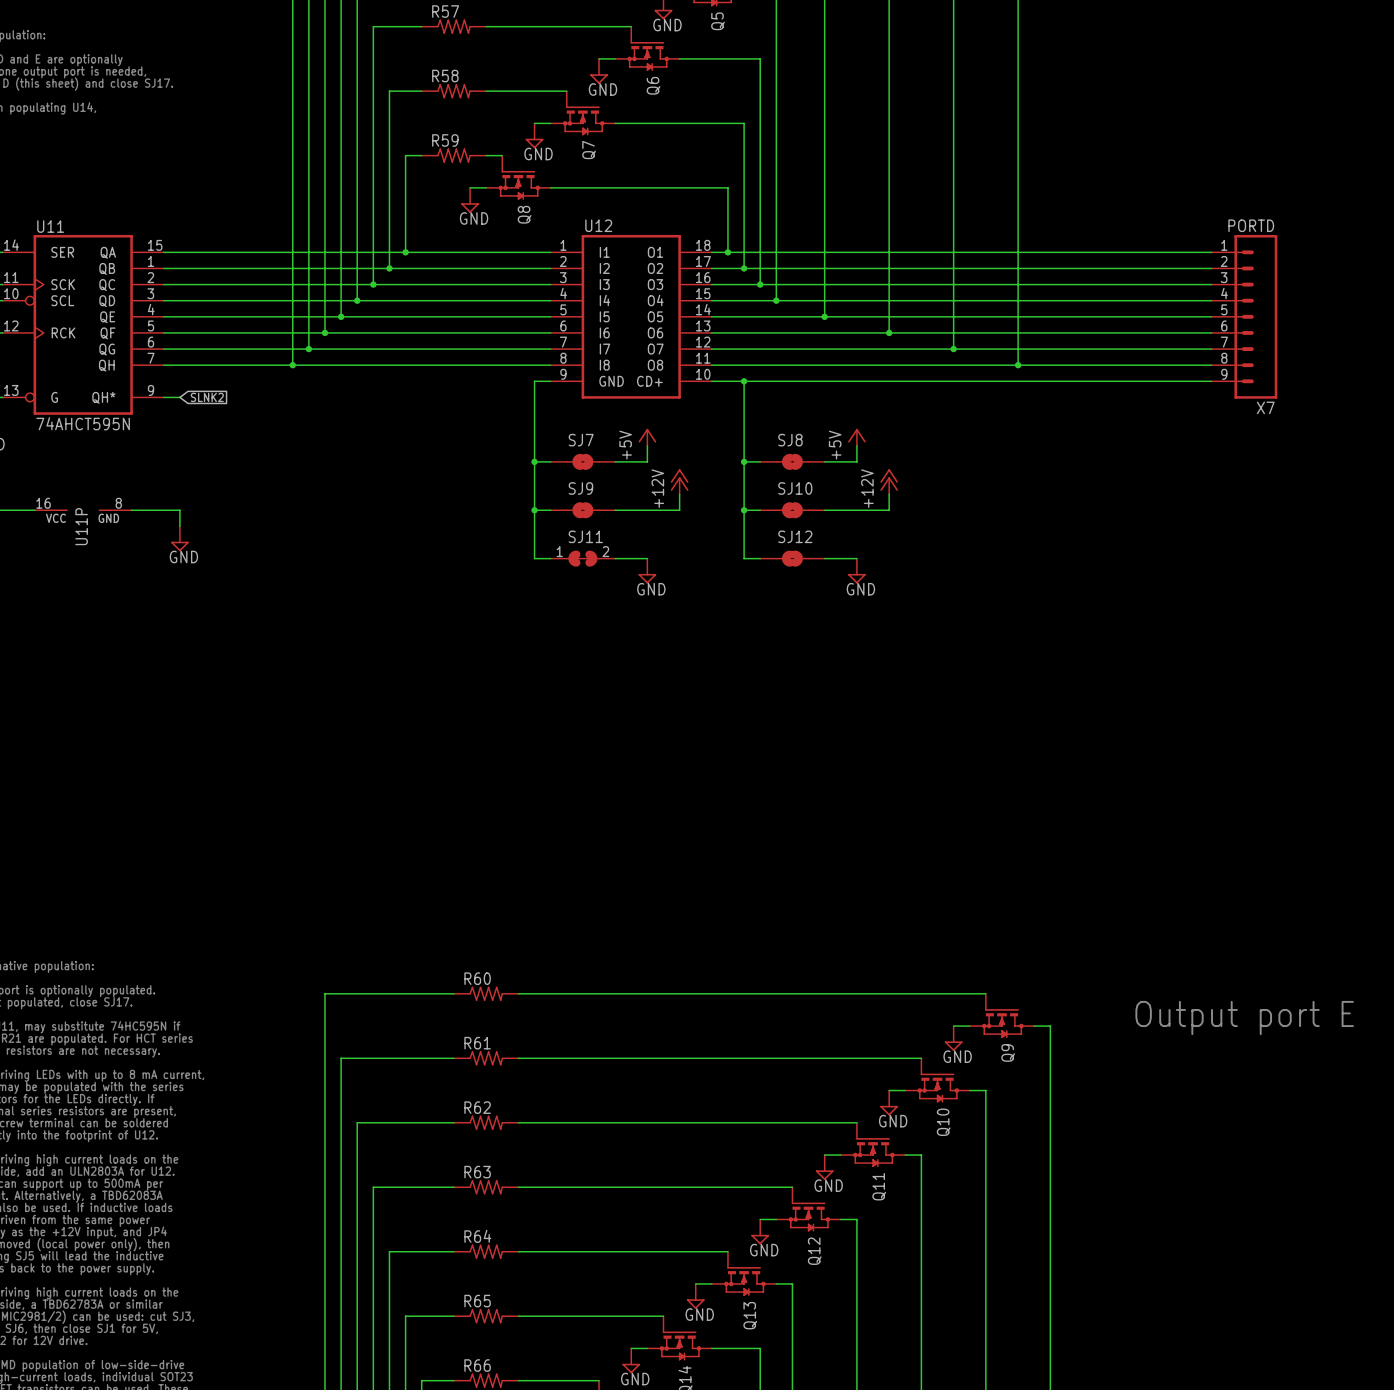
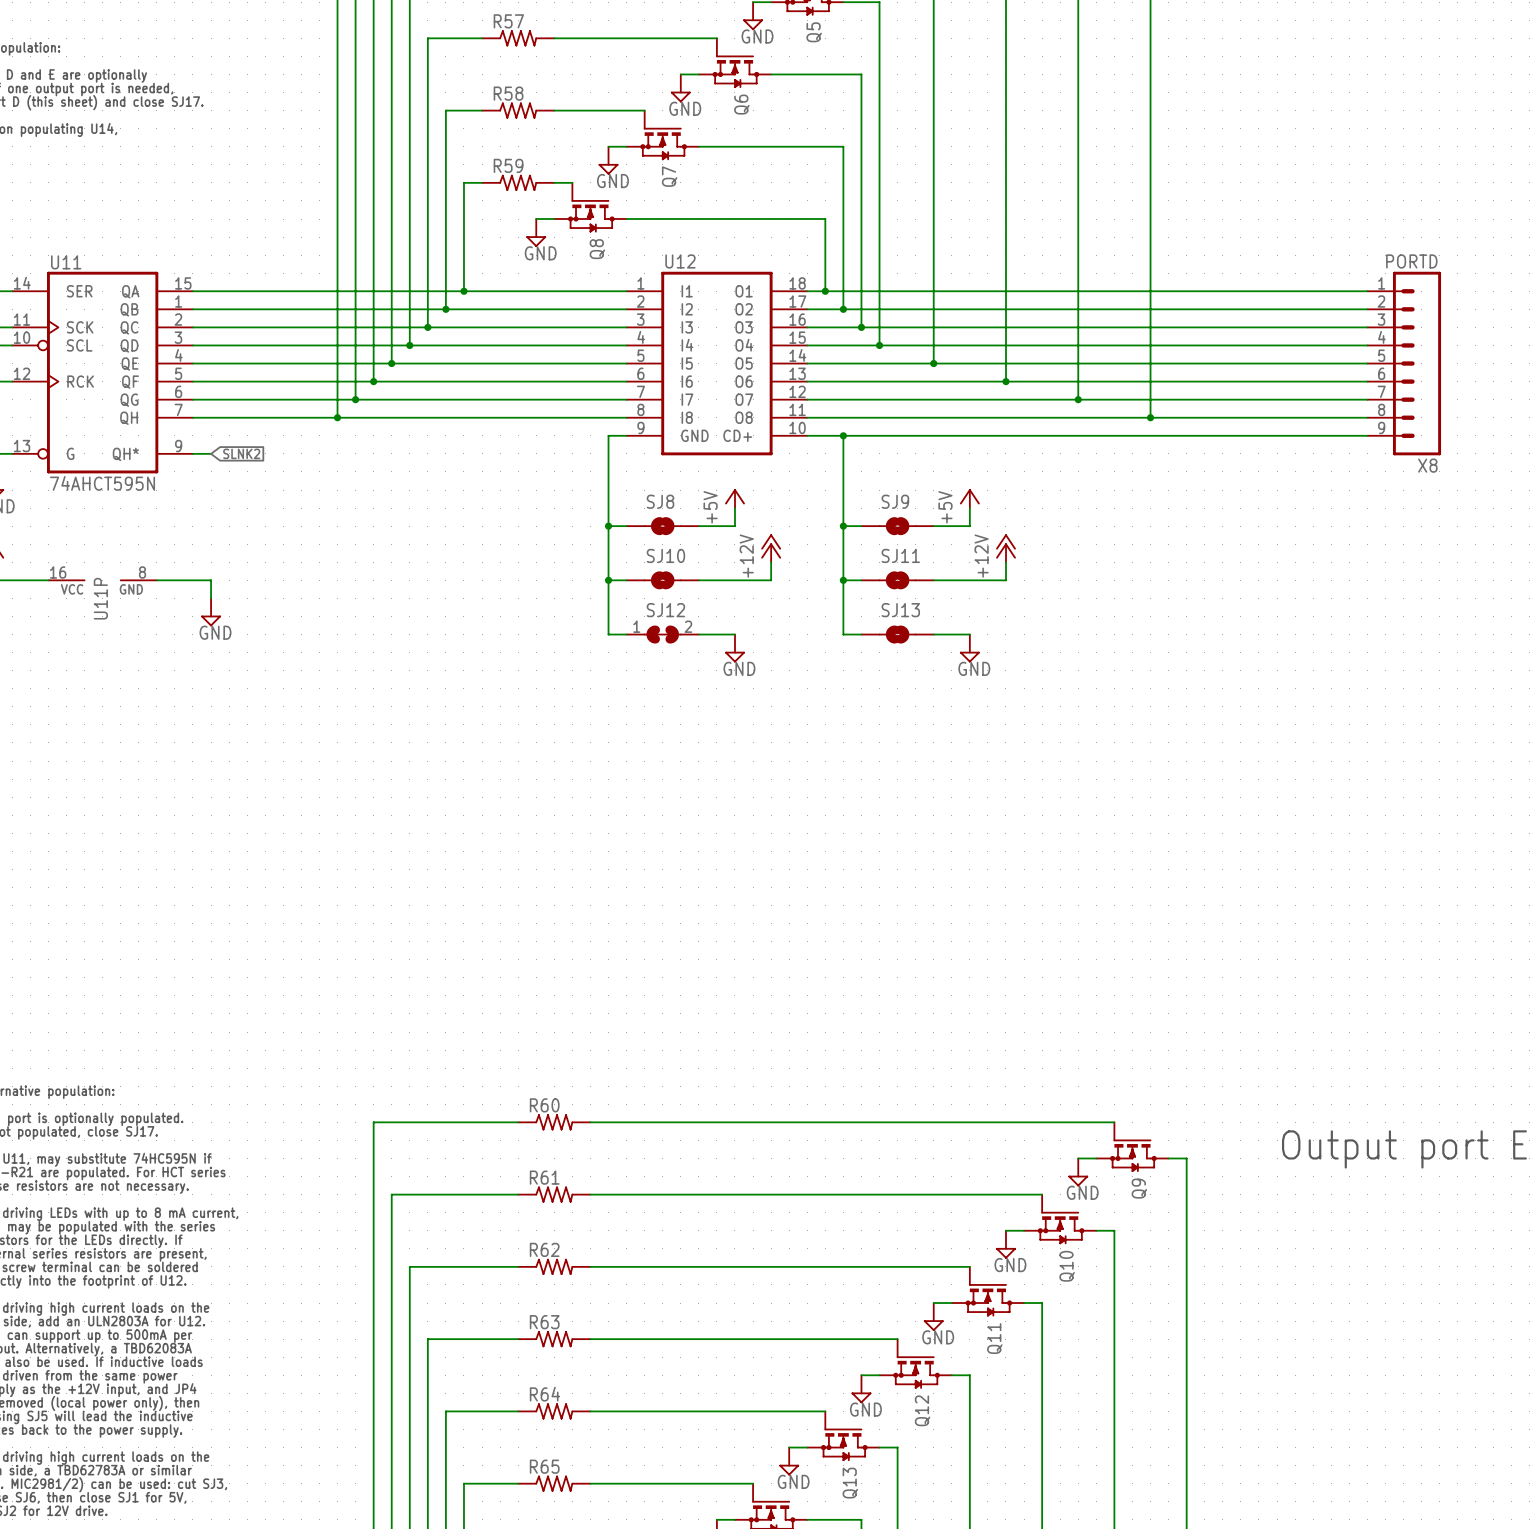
X7 name: X7 (1265, 407) -> X8 (1427, 465)
SJ7 name: SJ7 (581, 440) -> SJ8 (660, 501)
SJ8 name: SJ8 (790, 440) -> SJ9 (895, 501)
SJ9 name: SJ9 (580, 488) -> SJ10 (665, 555)
SJ10 name: SJ10 (795, 488) -> SJ11 (900, 555)
SJ11 name: SJ11 (585, 536) -> SJ12 (665, 610)
SJ12 name: SJ12 (795, 536) -> SJ13 (900, 610)

